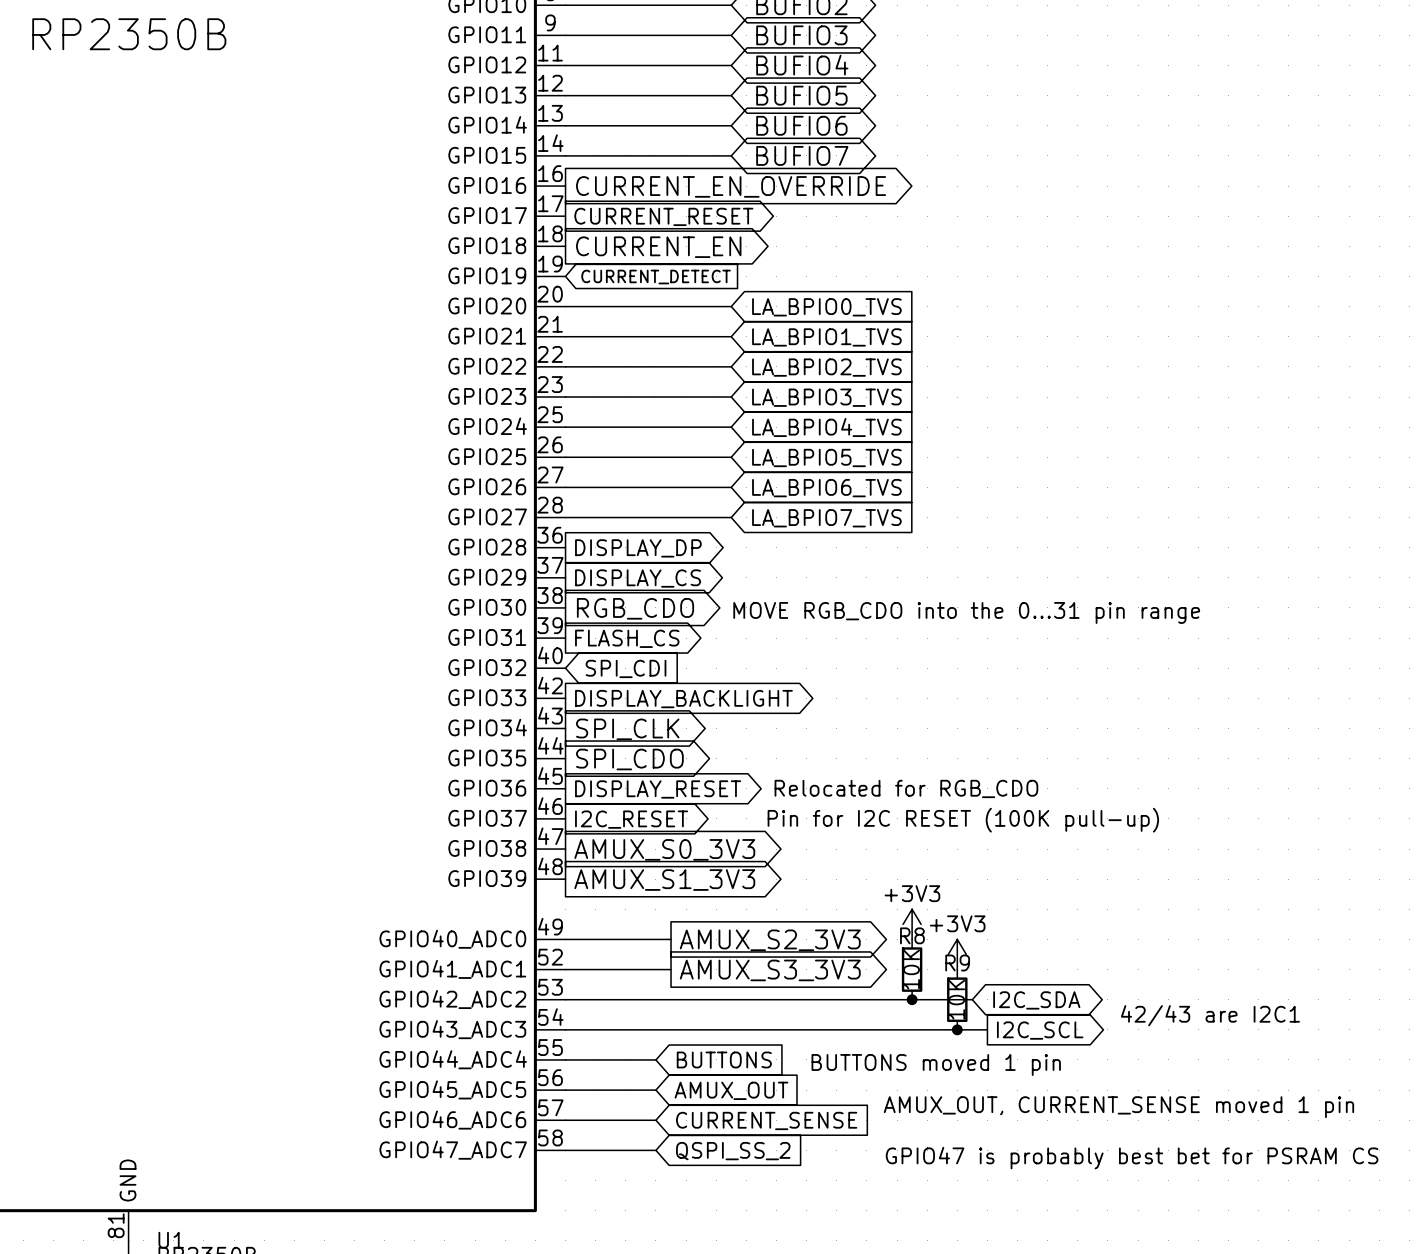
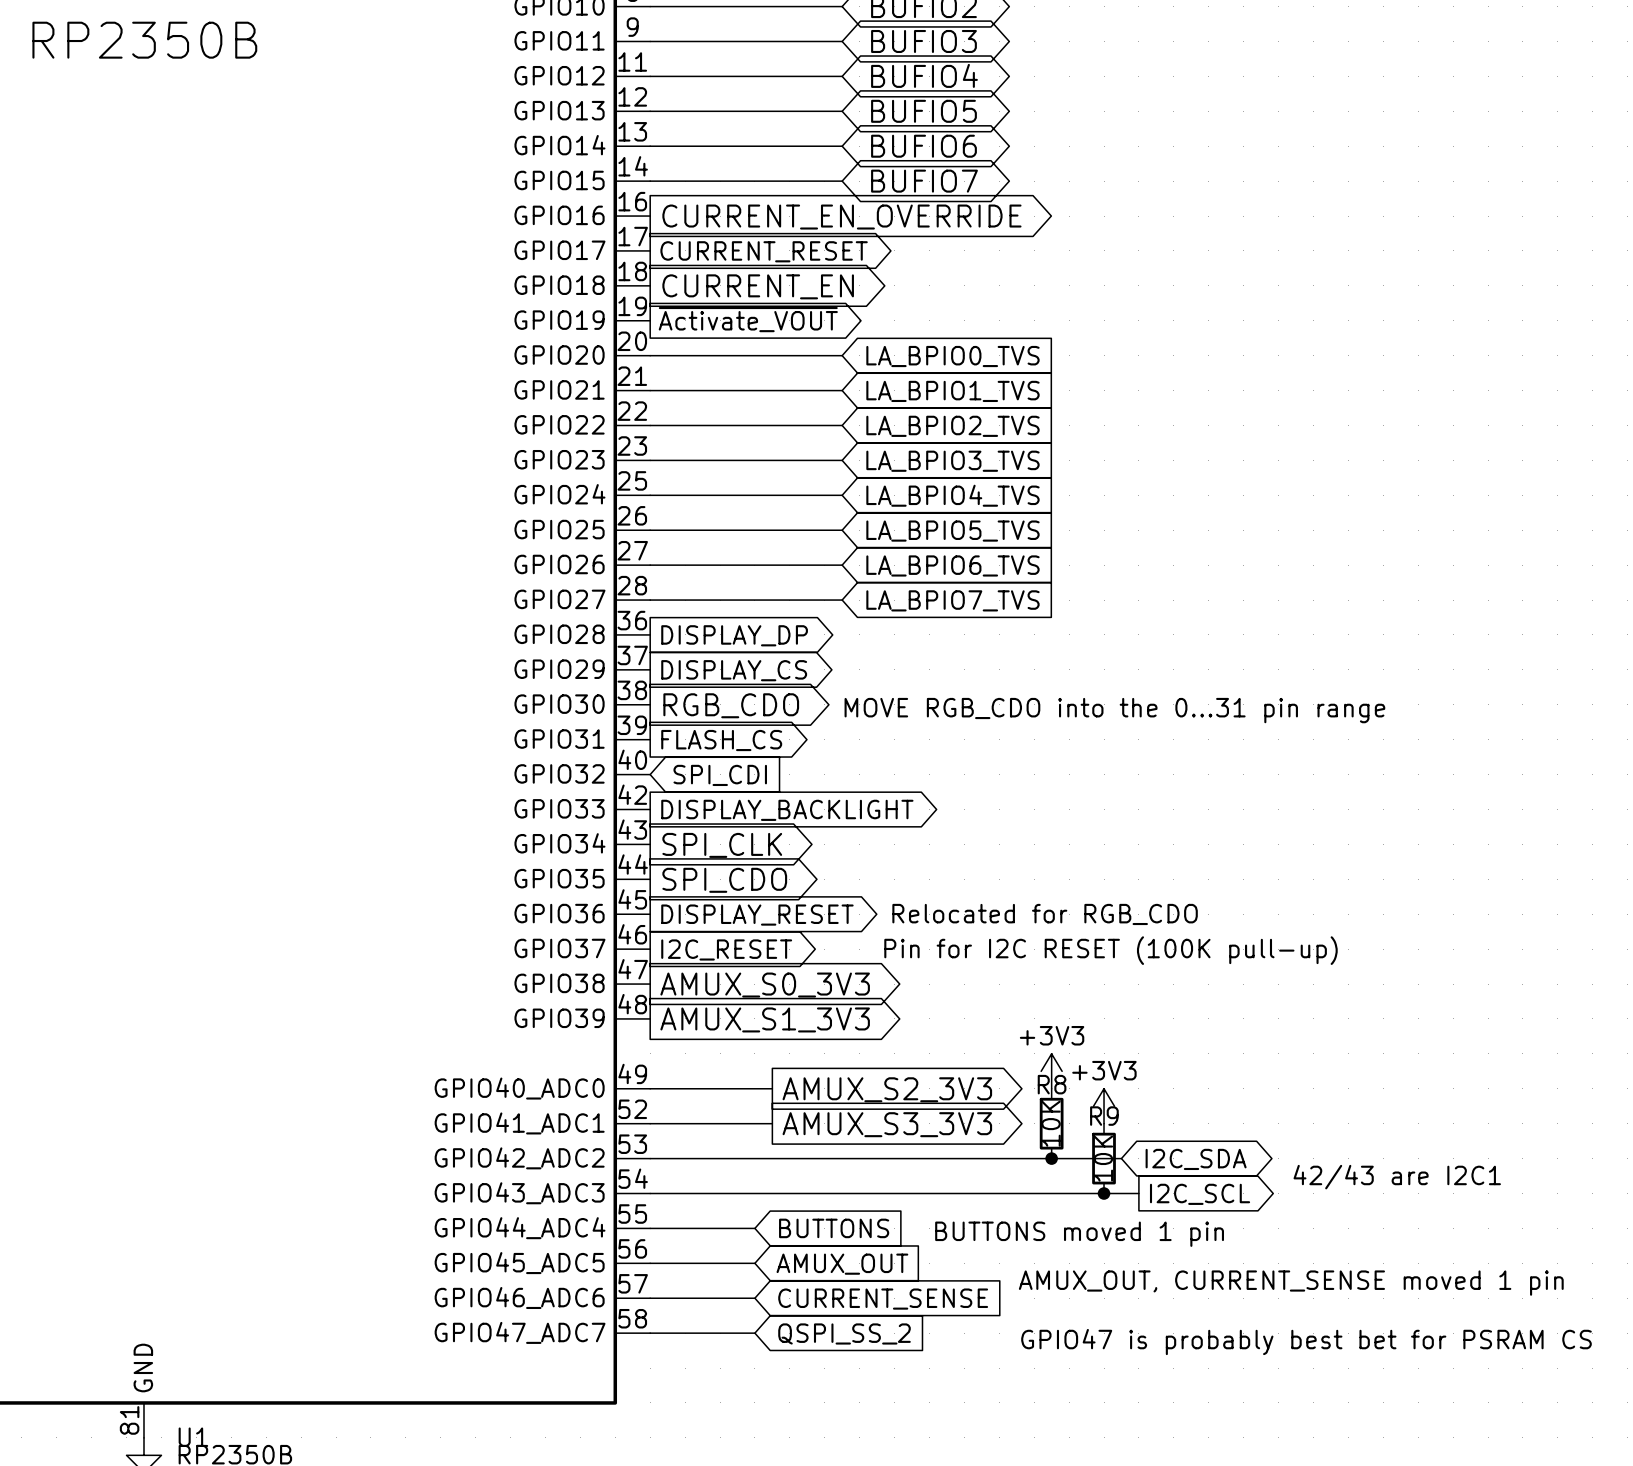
global label shape: input (656, 277) -> output (748, 319)
global label: CURRENT_DETECT (656, 277) -> ~{Activate_VOUT} (748, 319)

